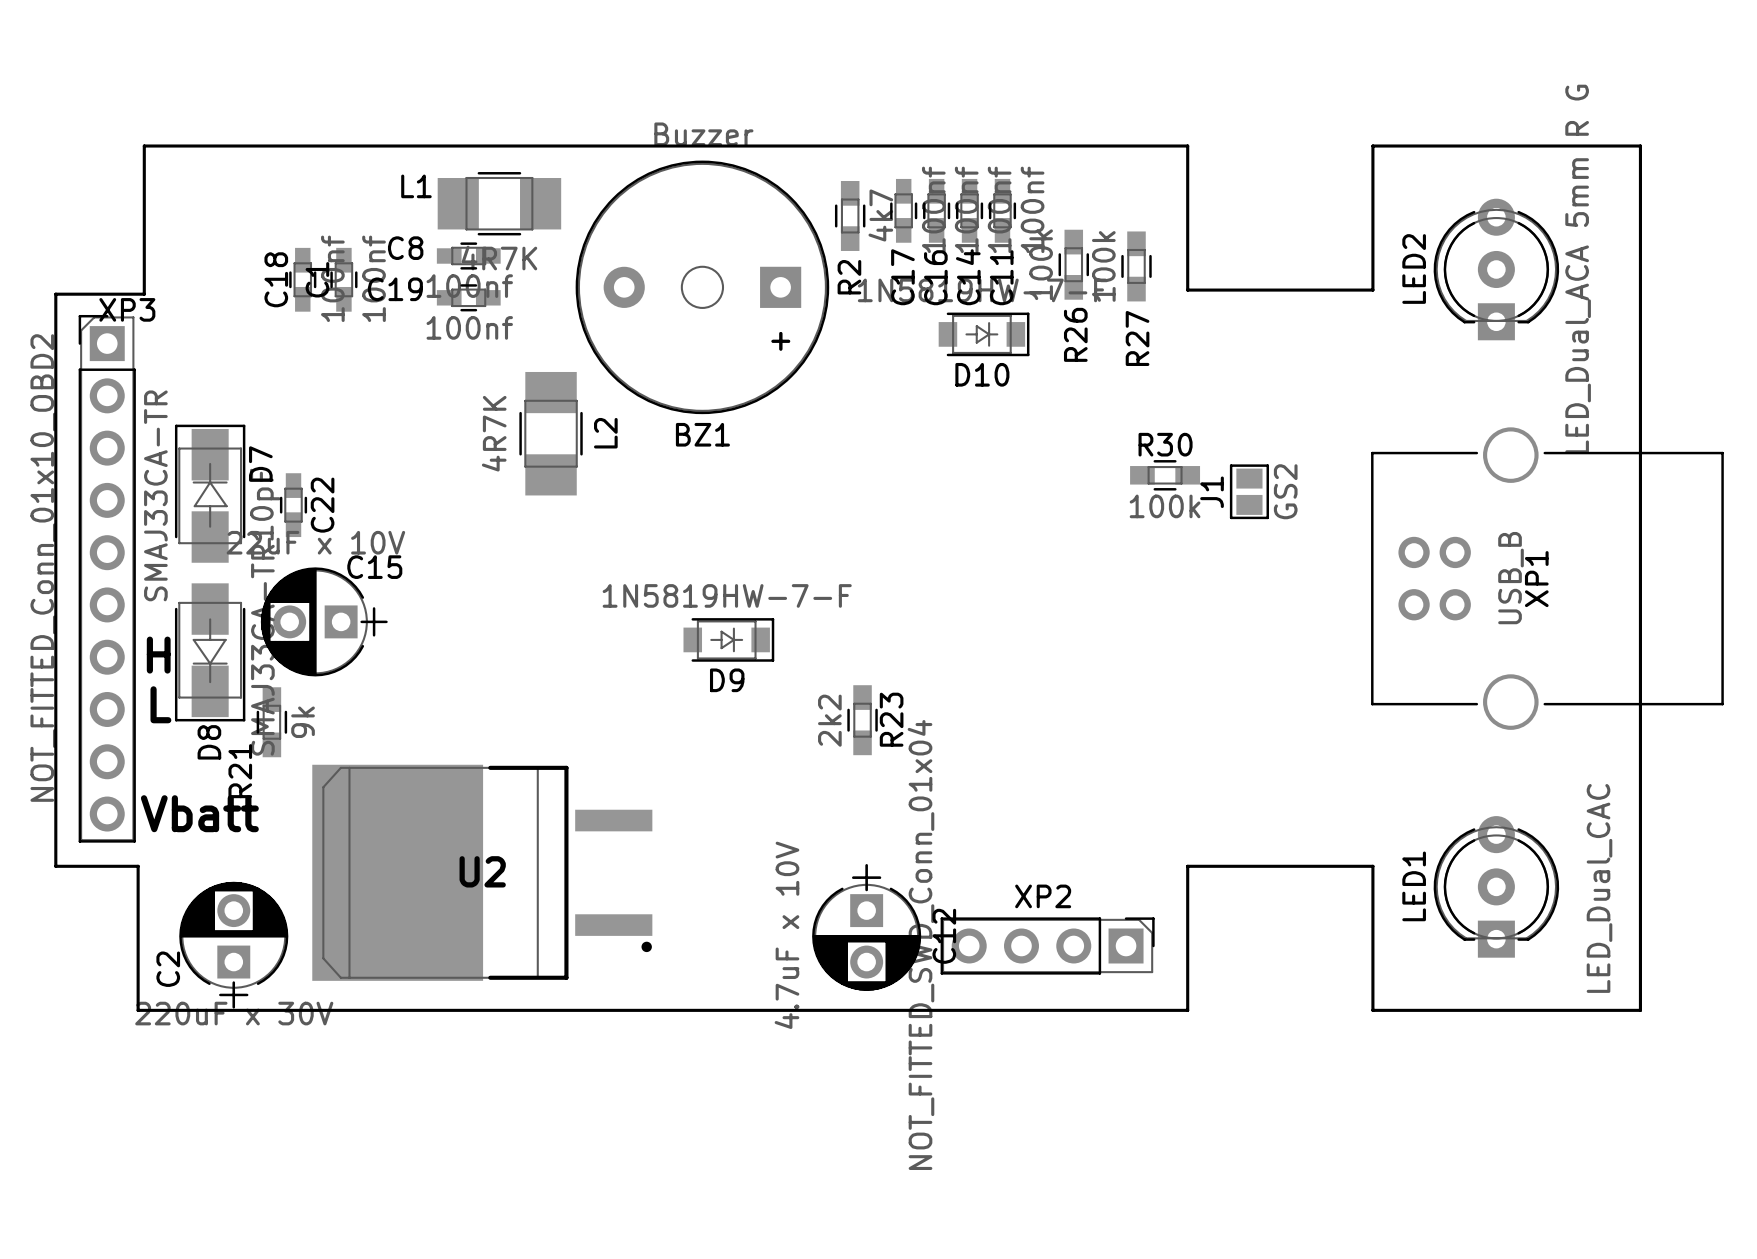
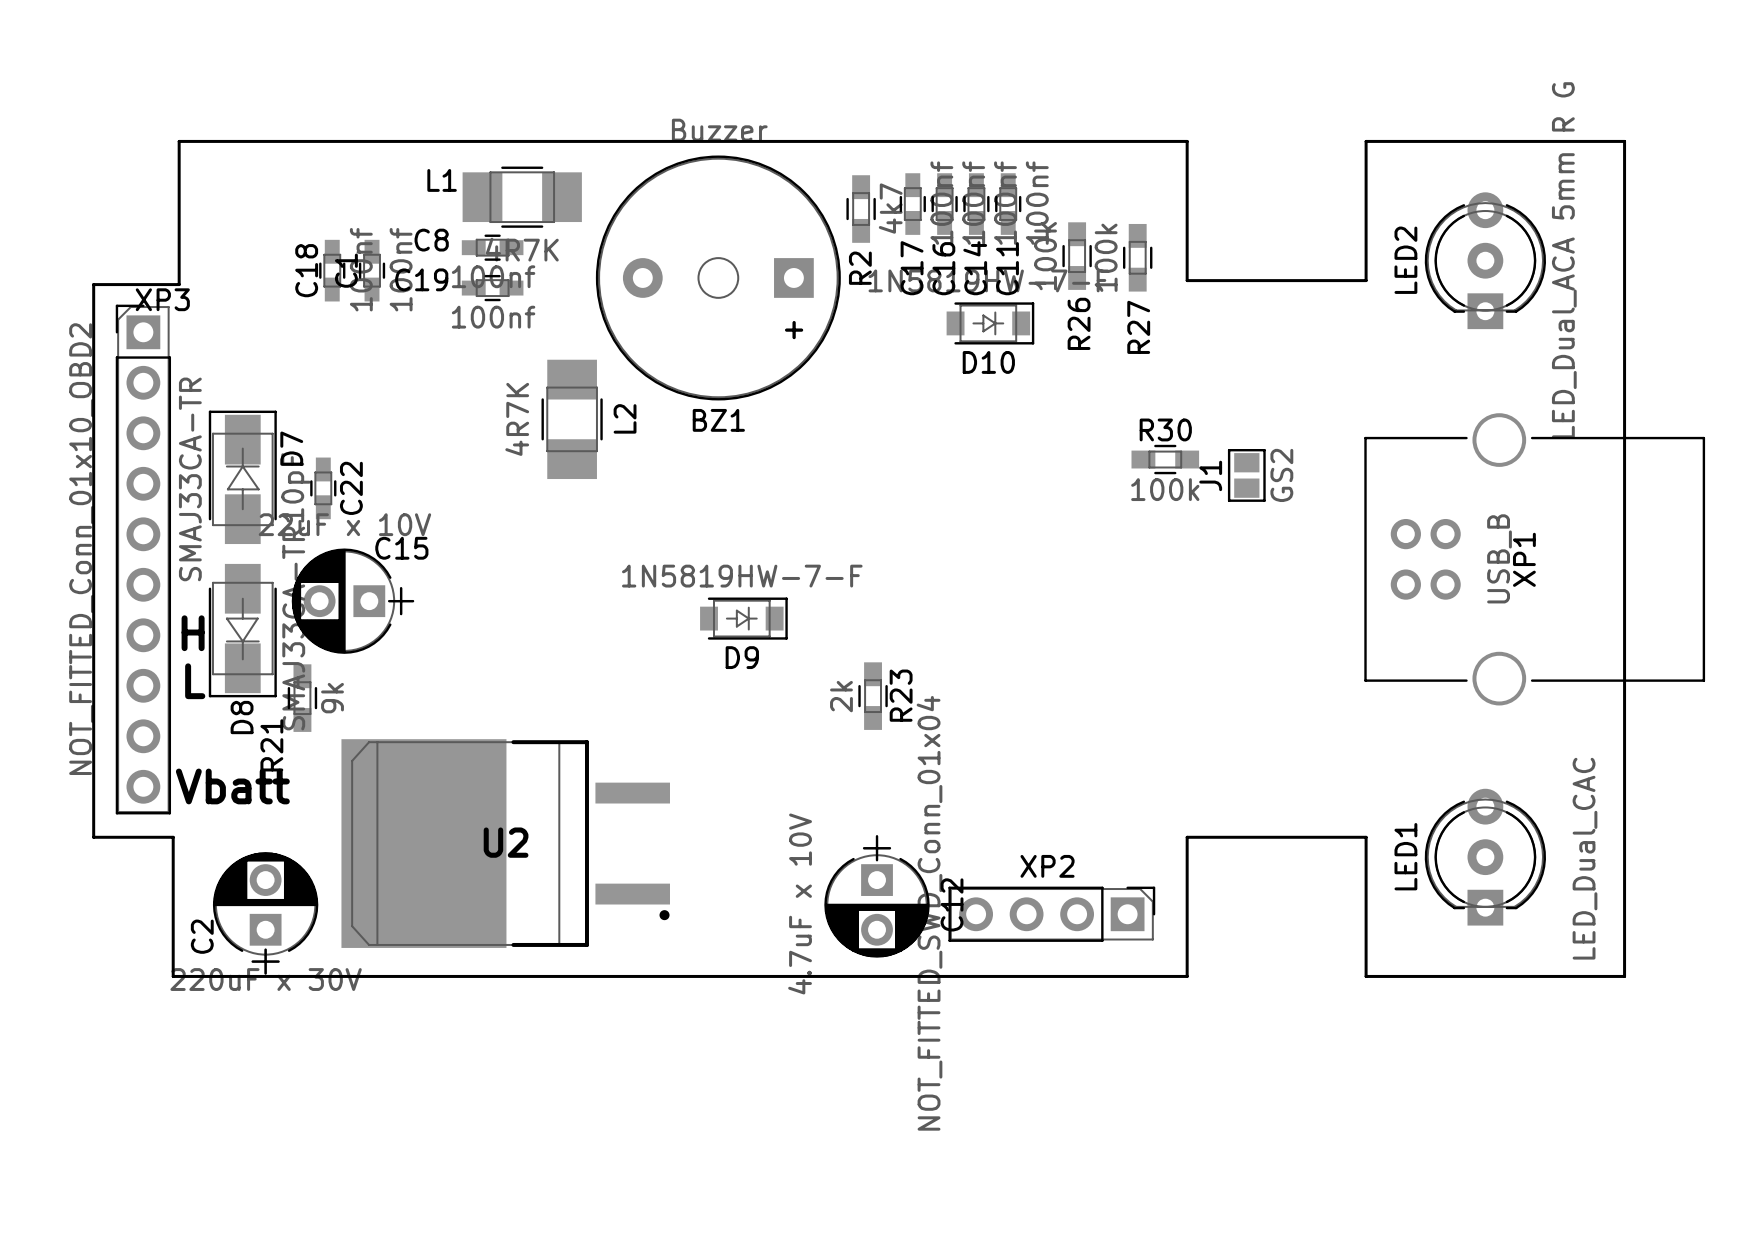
R23 value: 2k2 (829, 720) -> 2k (841, 696)

